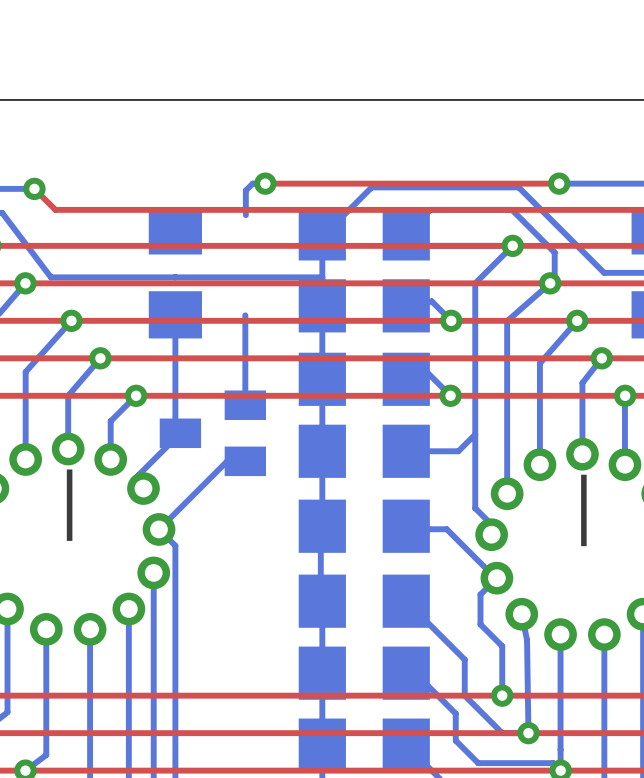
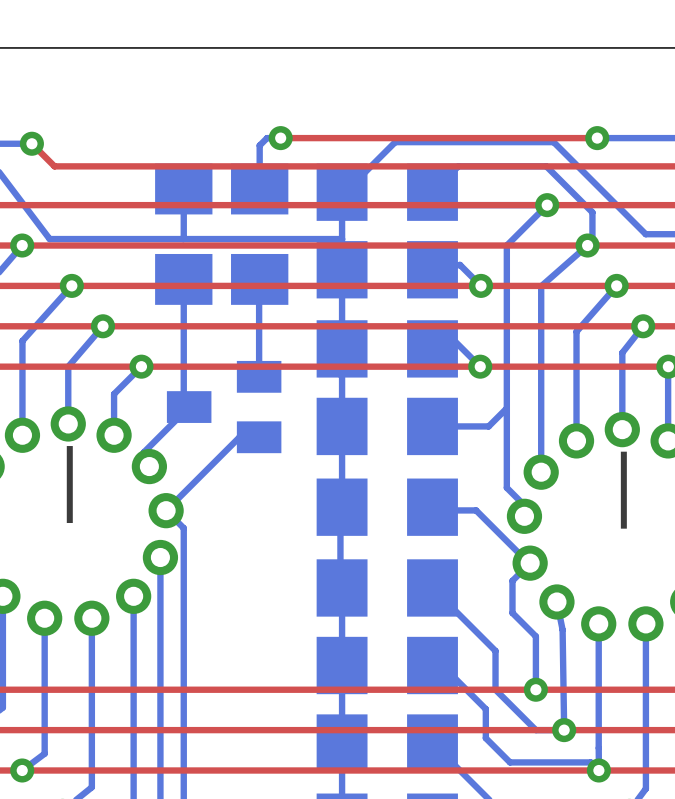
bottom track: none -> (183, 188) (183, 238)
part: none -> (259, 234)

